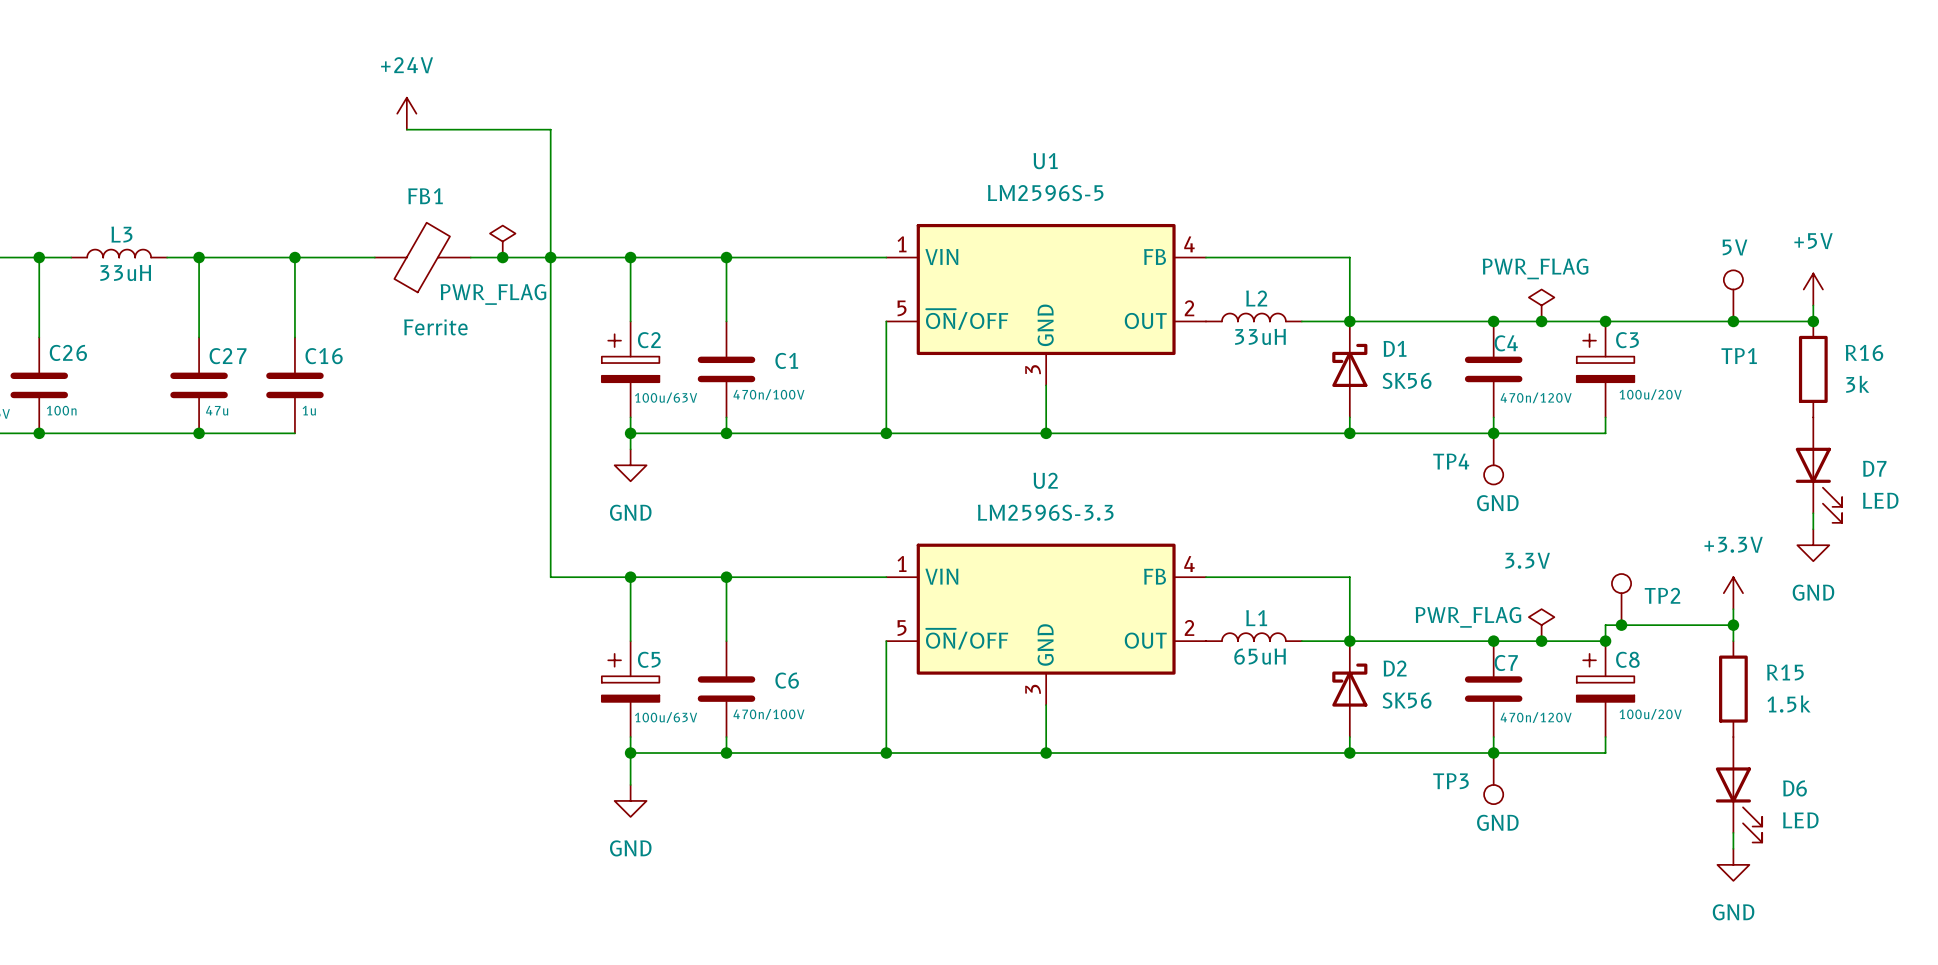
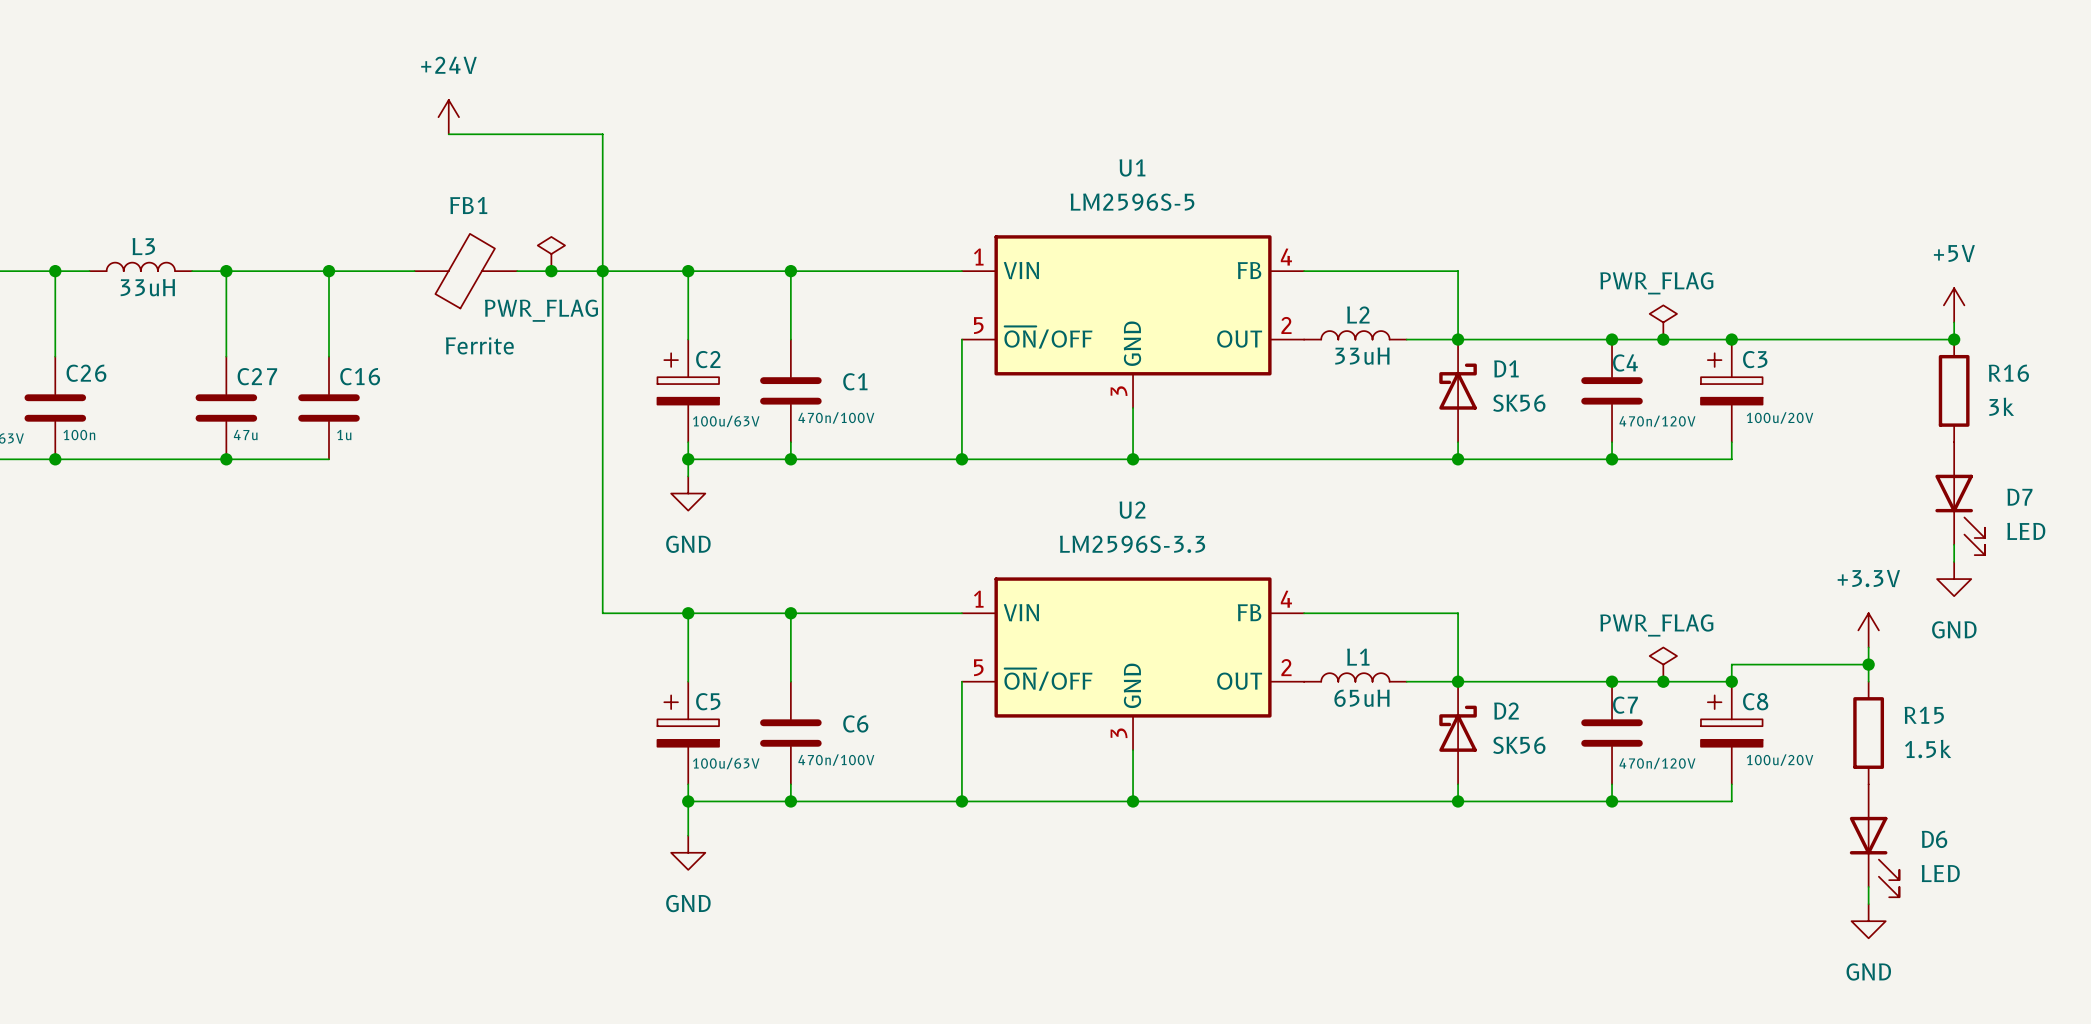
TP1: 5V (1733, 295) -> none
junction: (1733, 321) -> none
TP4: GND (1493, 458) -> none
TP2: 3.3V (1621, 599) -> none
power symbol text position: PWR_FLAG (1468, 617) -> PWR_FLAG (1656, 625)
junction: (1621, 625) -> none
TP3: GND (1493, 778) -> none

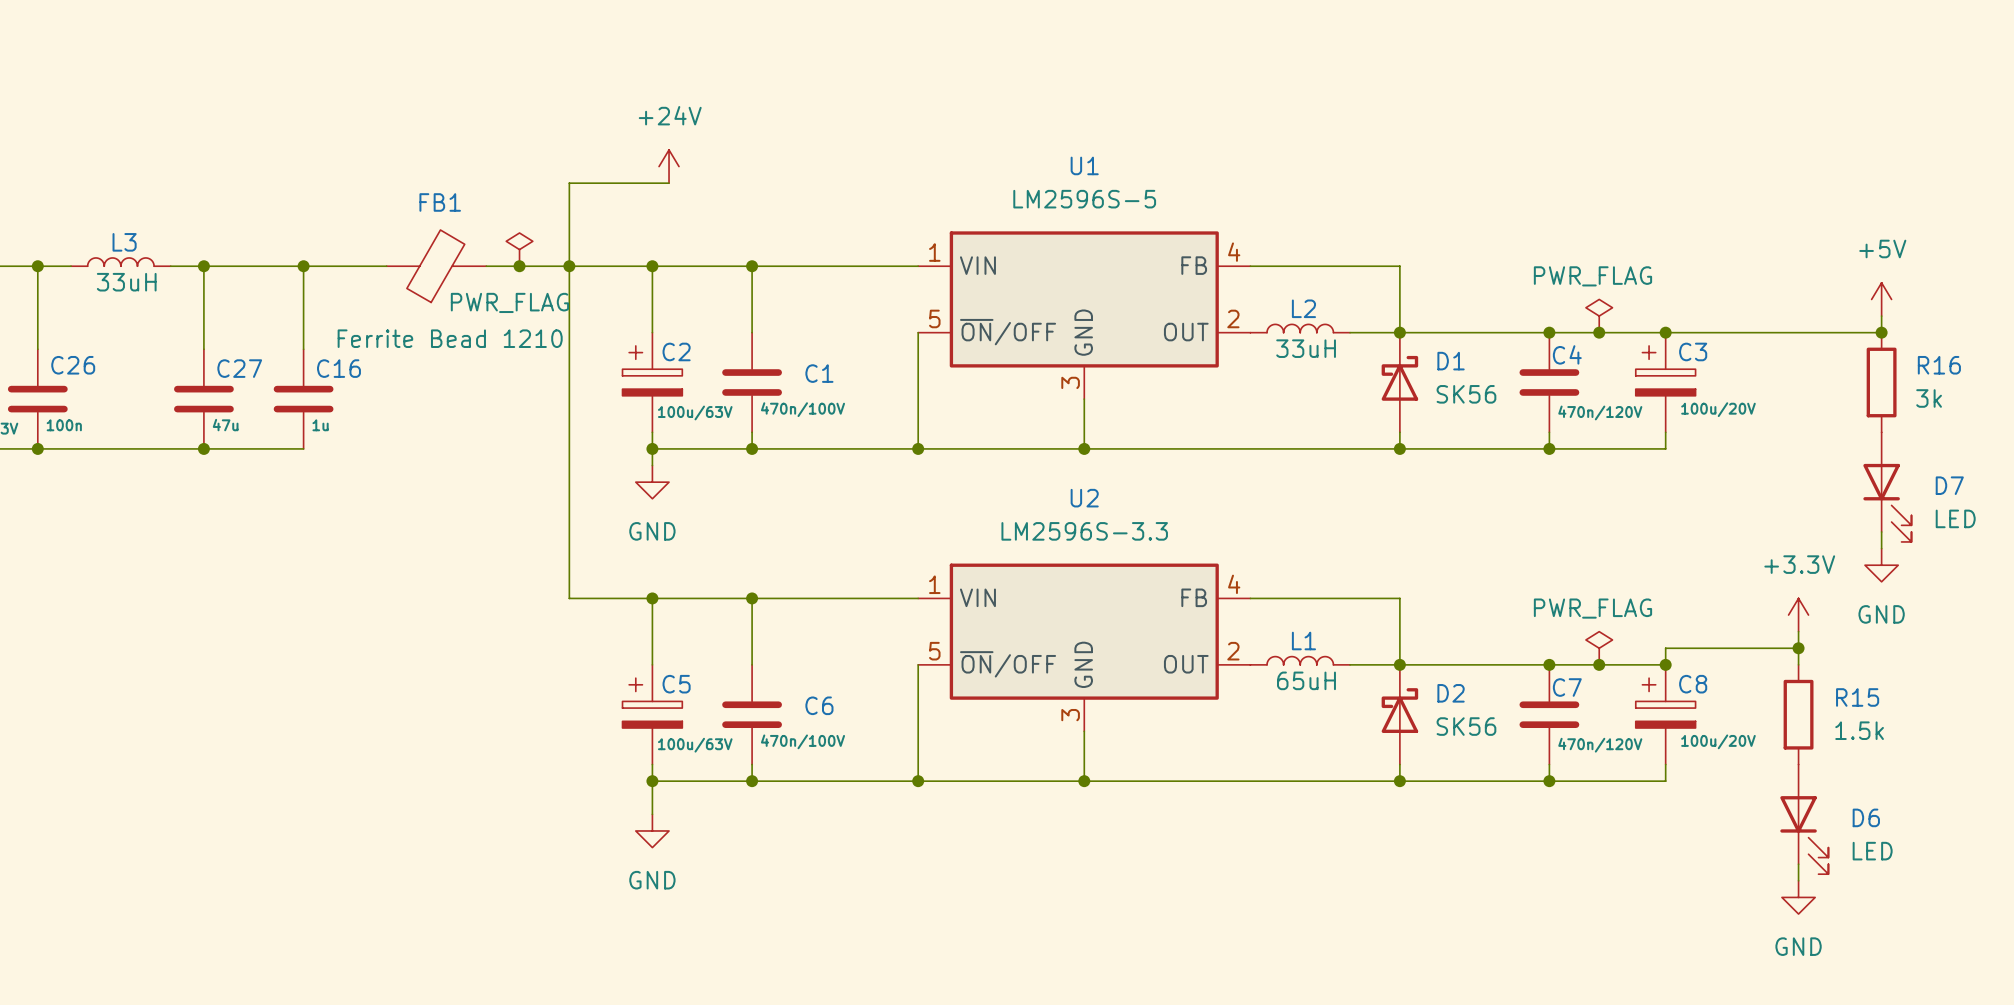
power symbol position: +24V (448, 117) -> +24V (669, 166)
wire: (448, 134) (602, 134) (602, 185) -> (669, 183) (569, 183)
FB1 value: Ferrite (479, 345) -> Ferrite Bead 1210 (450, 338)

